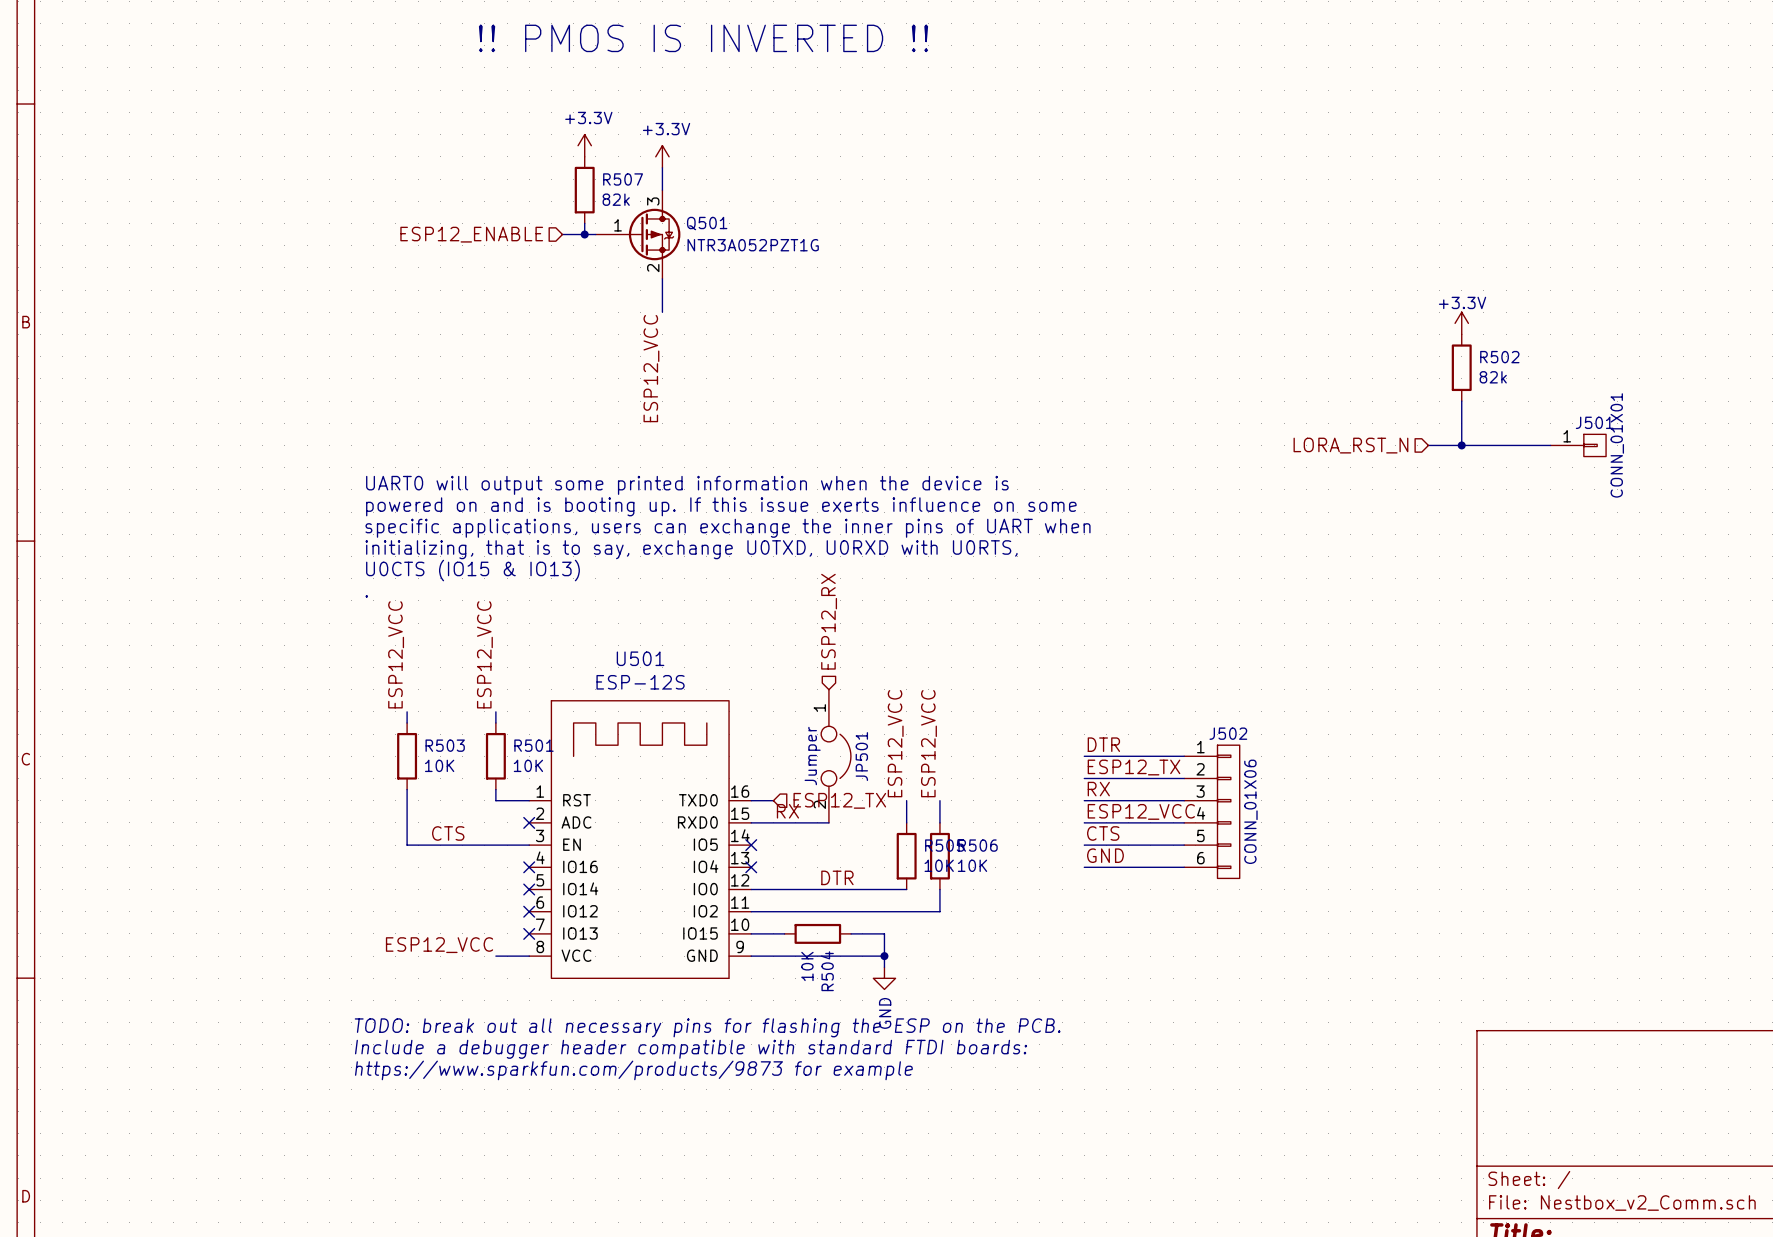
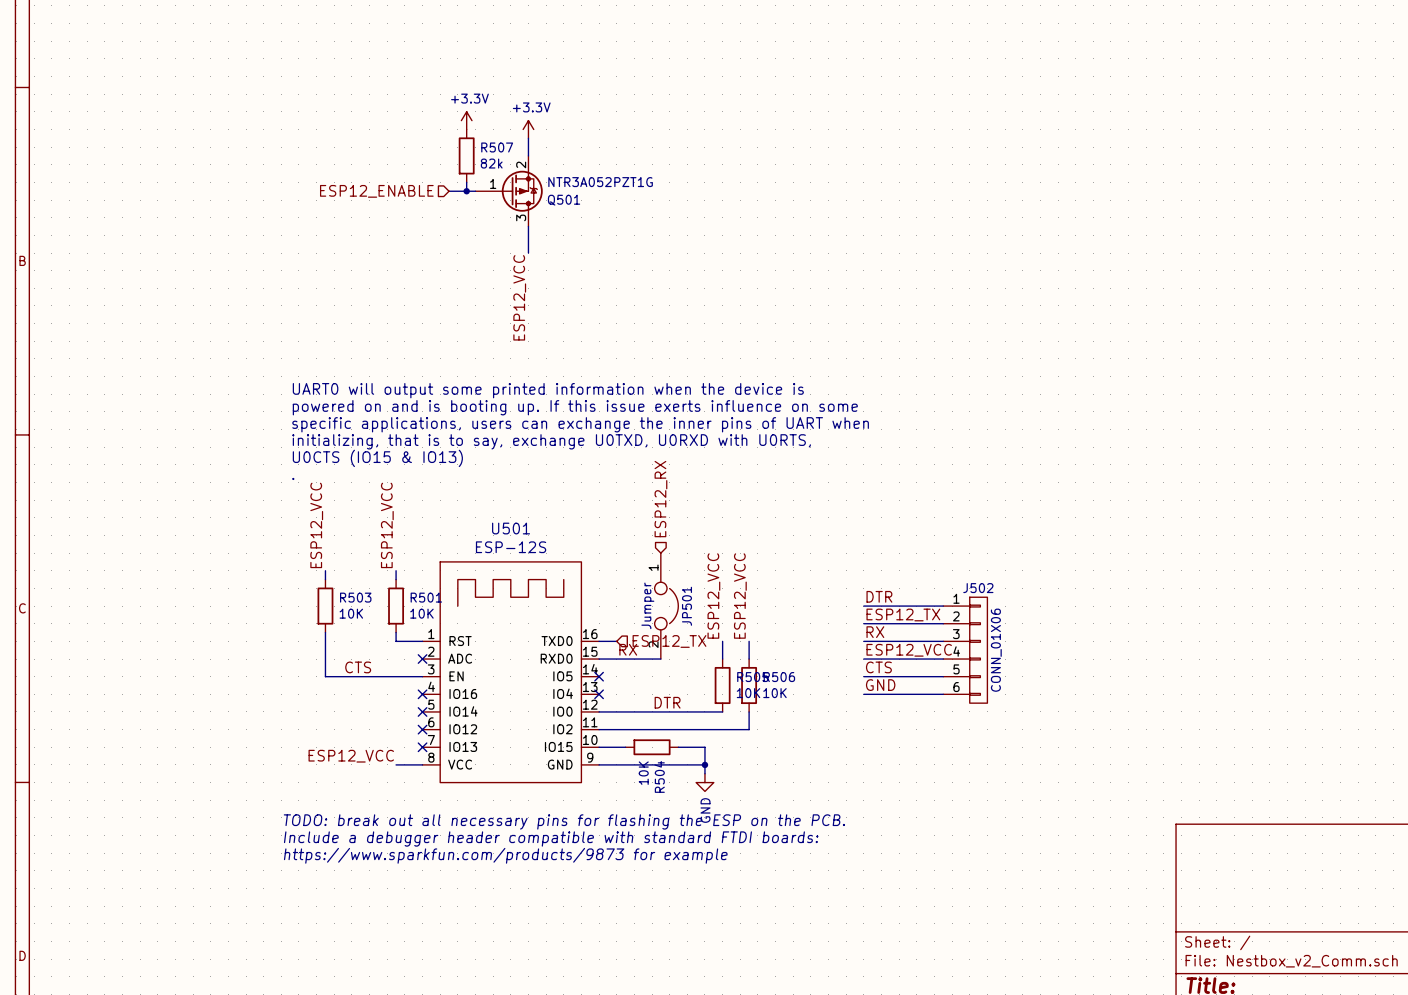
text: !! PMOS IS INVERTED !! (703, 38) -> none
Q501 flip: as is (654, 234) -> up-down (522, 191)
power symbol: +3.3V (1461, 323) -> none
R502: 82k (1461, 367) -> none
wire: (1461, 401) (1461, 445) -> none
hierarchical label: LORA_RST_N (1350, 445) -> none
wire: (1428, 445) (1550, 445) -> none
junction: (1461, 445) -> none
J501: CONN_01X01 (1578, 445) -> none

